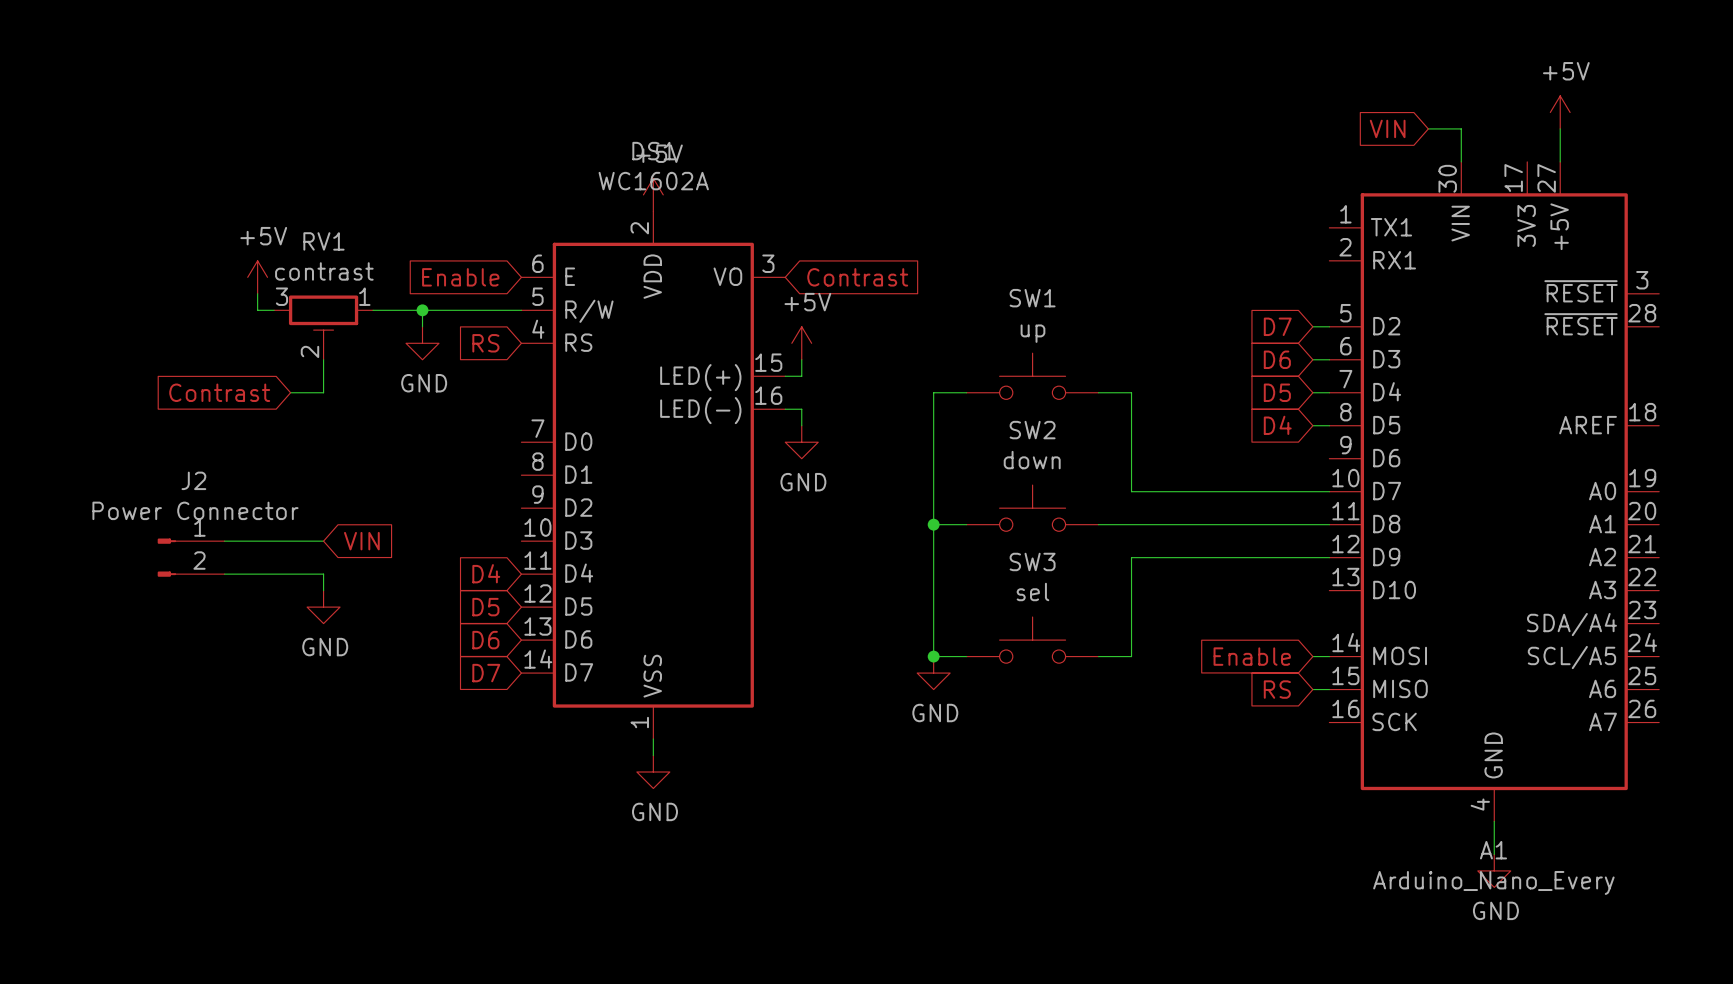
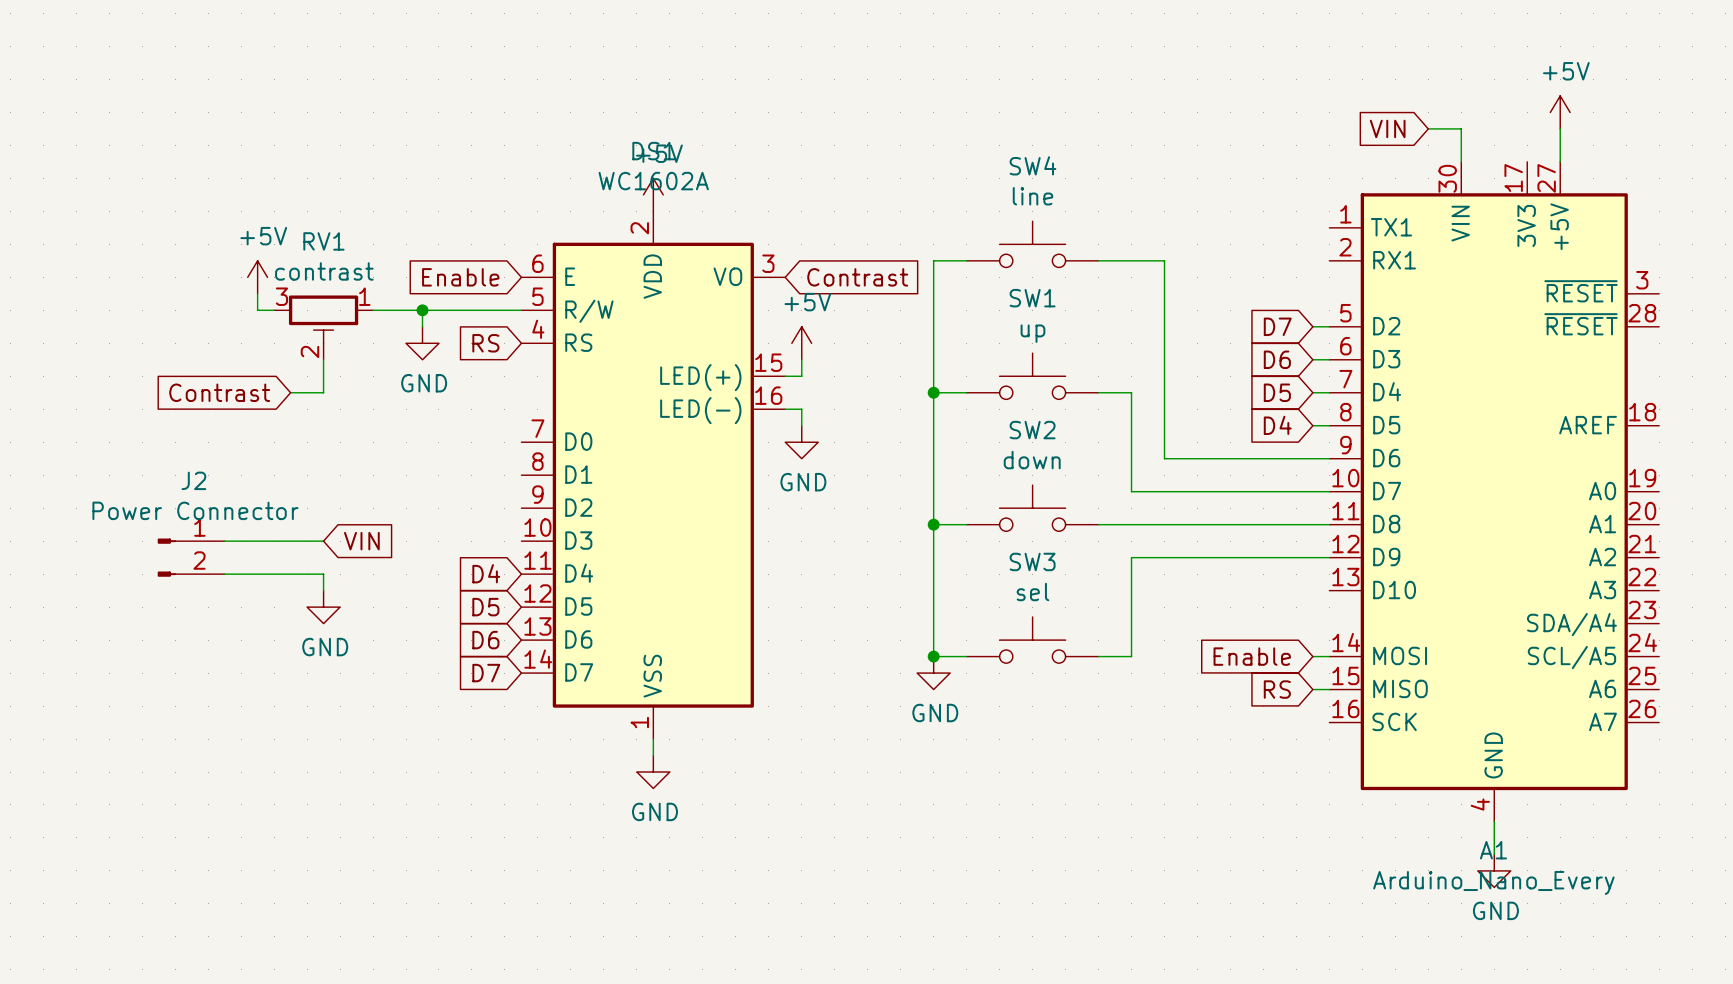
SW4: none -> line (1032, 244)
wire: none -> (966, 260) (933, 260) (933, 392)
wire: none -> (1098, 260) (1164, 260) (1164, 458) (1329, 458)
junction: none -> (933, 392)

